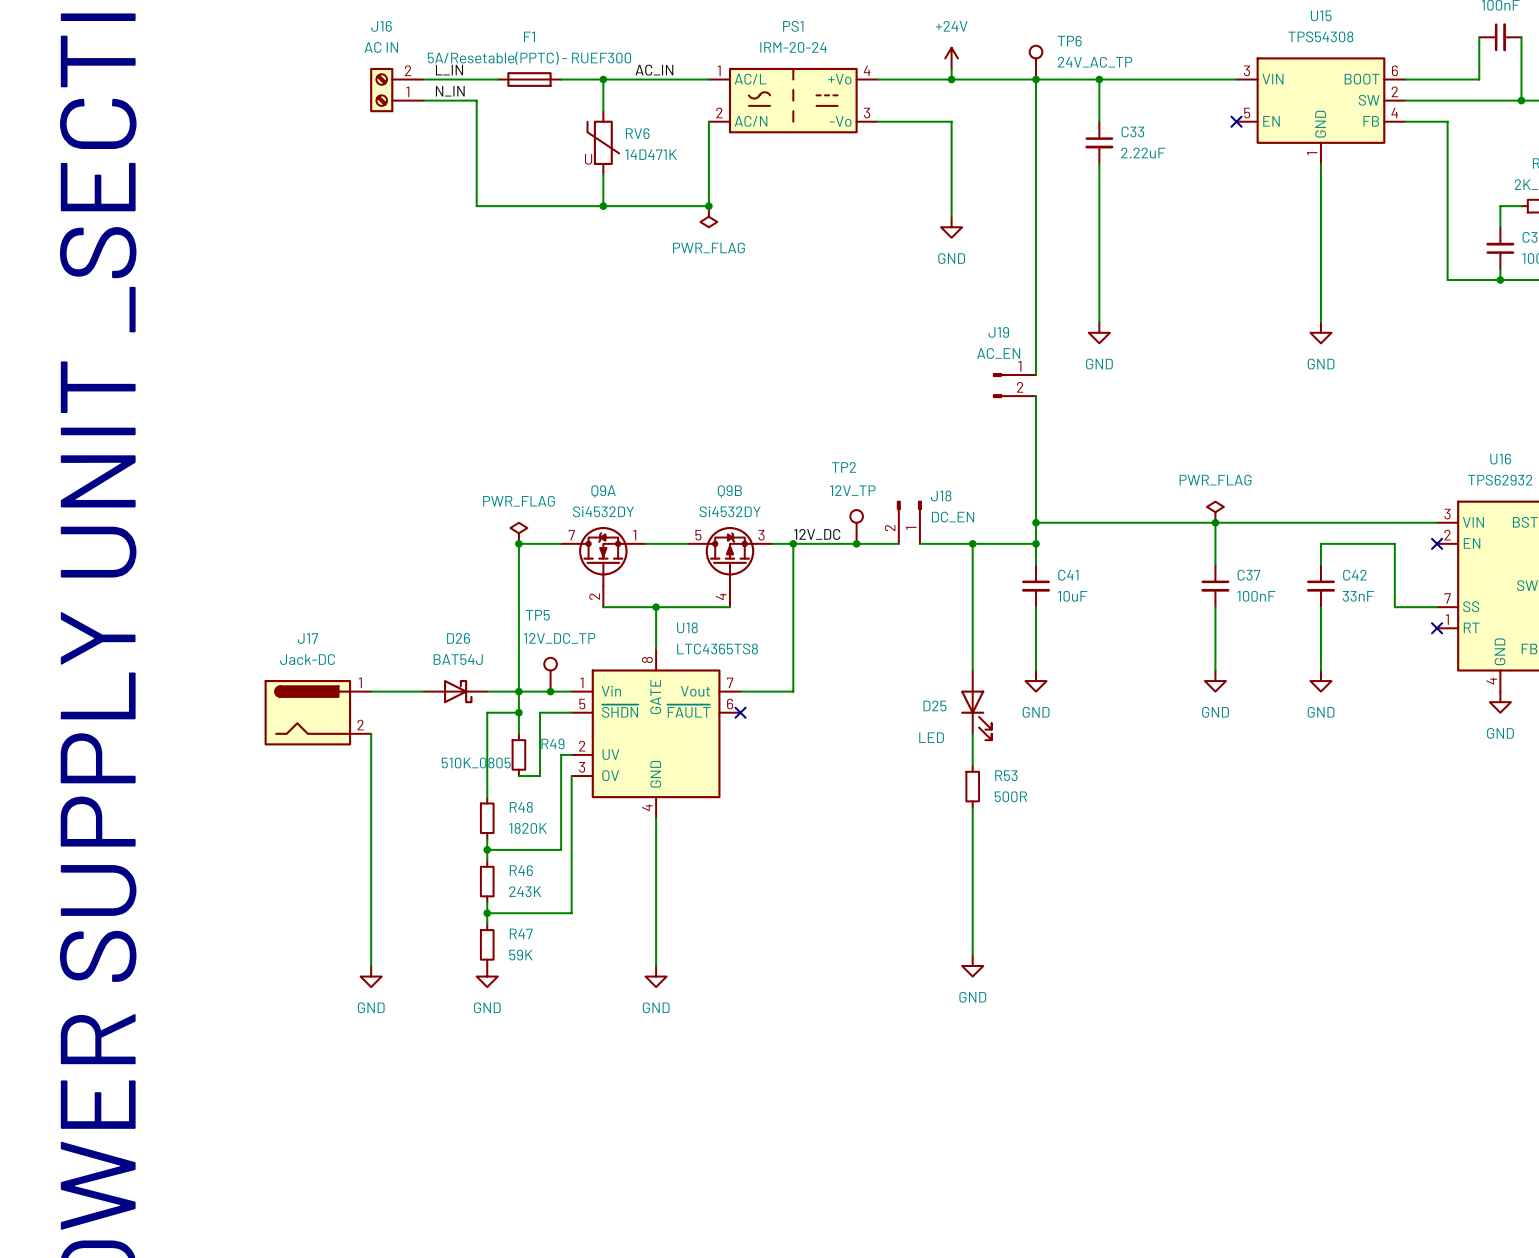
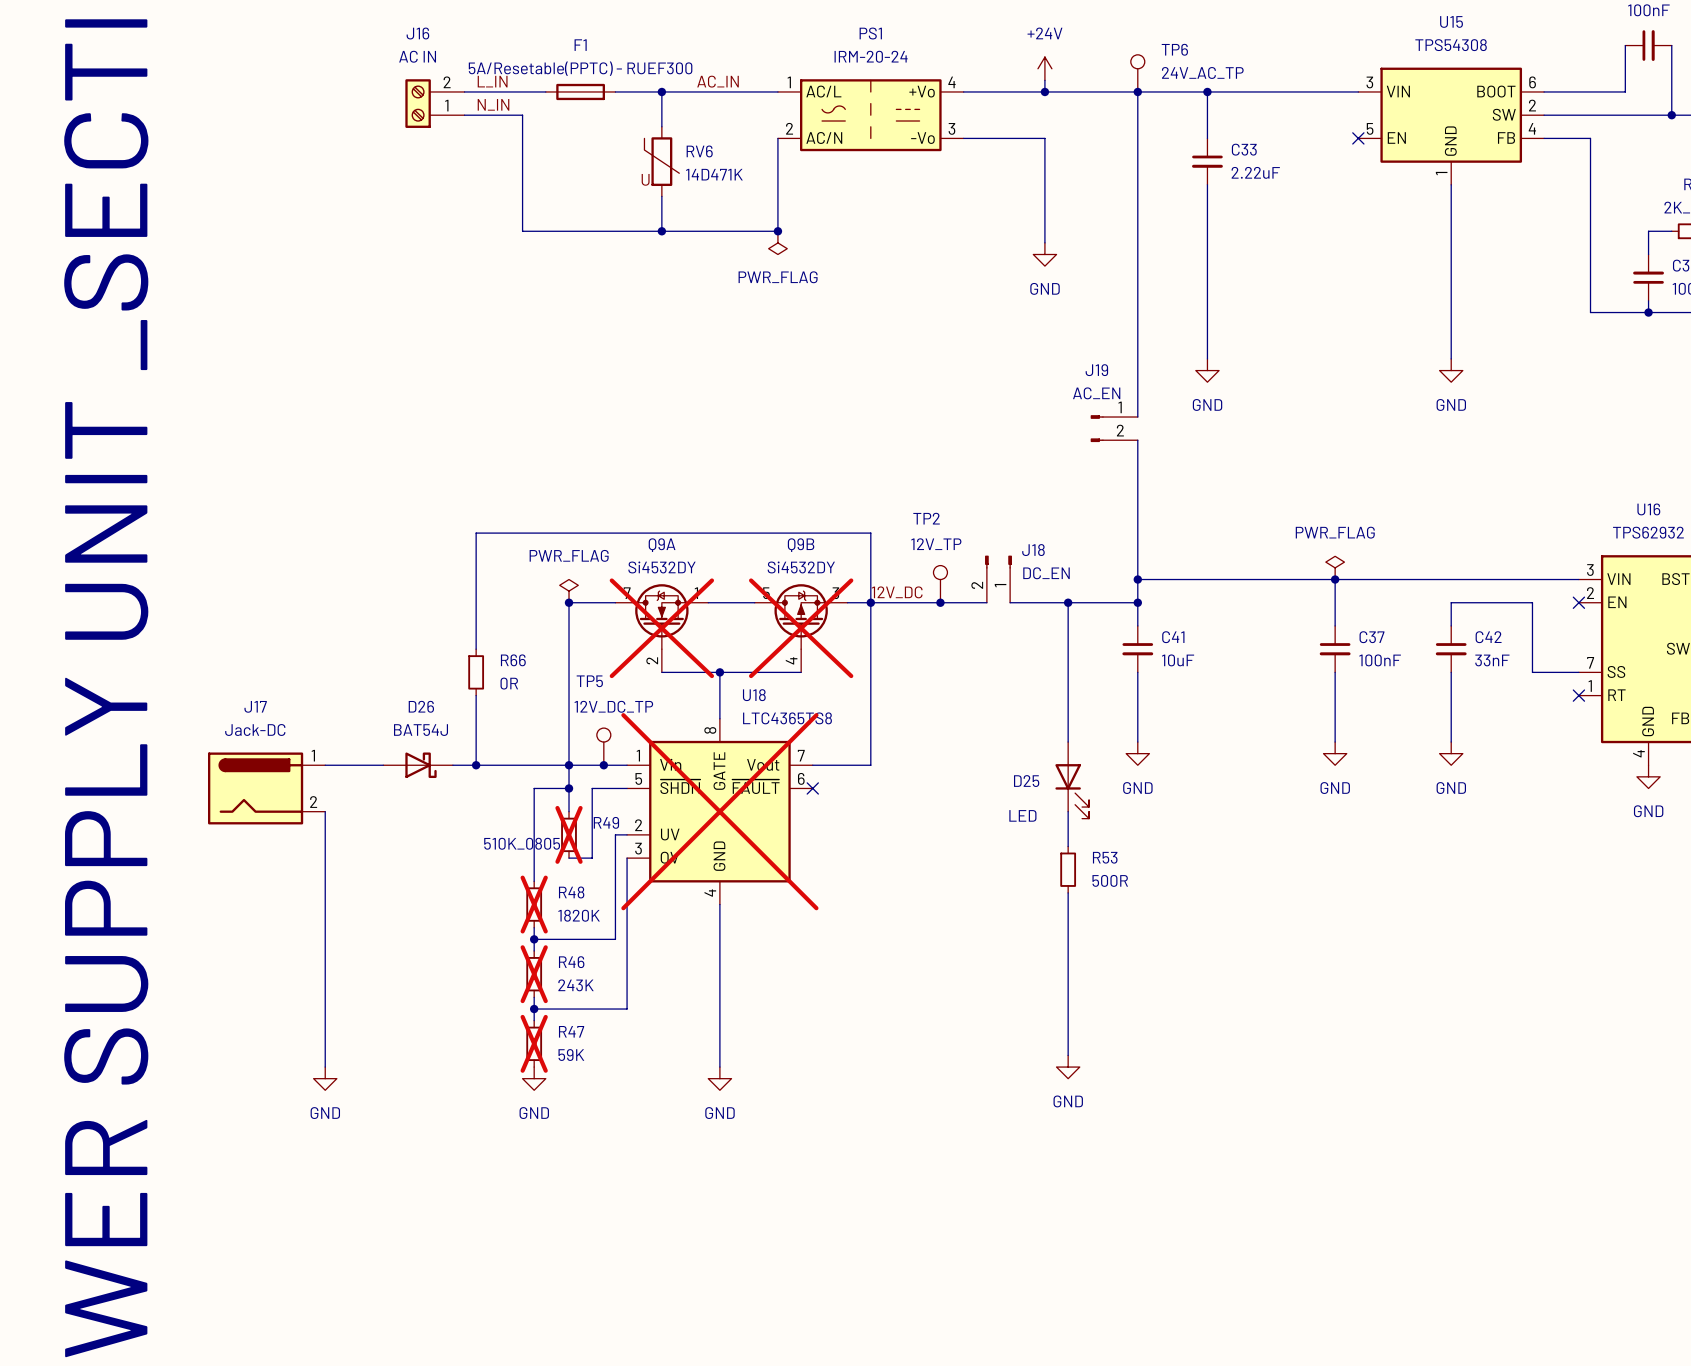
wire: none -> (870, 602) (870, 533) (476, 533) (476, 649)
Q9A do-not-place cross: none -> (661, 628)
Q9B do-not-place cross: none -> (801, 628)
R66: none -> 0R (476, 672)
wire: none -> (476, 695) (476, 765)
junction: none -> (476, 765)
D26 position: (455, 691) -> (418, 765)
J17 position: (317, 712) -> (266, 788)
wire: (371, 733) (371, 965) -> (325, 811) (325, 1067)
U18 do-not-place cross: none -> (719, 811)
R49 do-not-place cross: none -> (569, 834)
R48 do-not-place cross: none -> (534, 904)
R46 do-not-place cross: none -> (534, 974)
R47 do-not-place cross: none -> (534, 1043)
power symbol position: GND (371, 976) -> GND (325, 1078)

